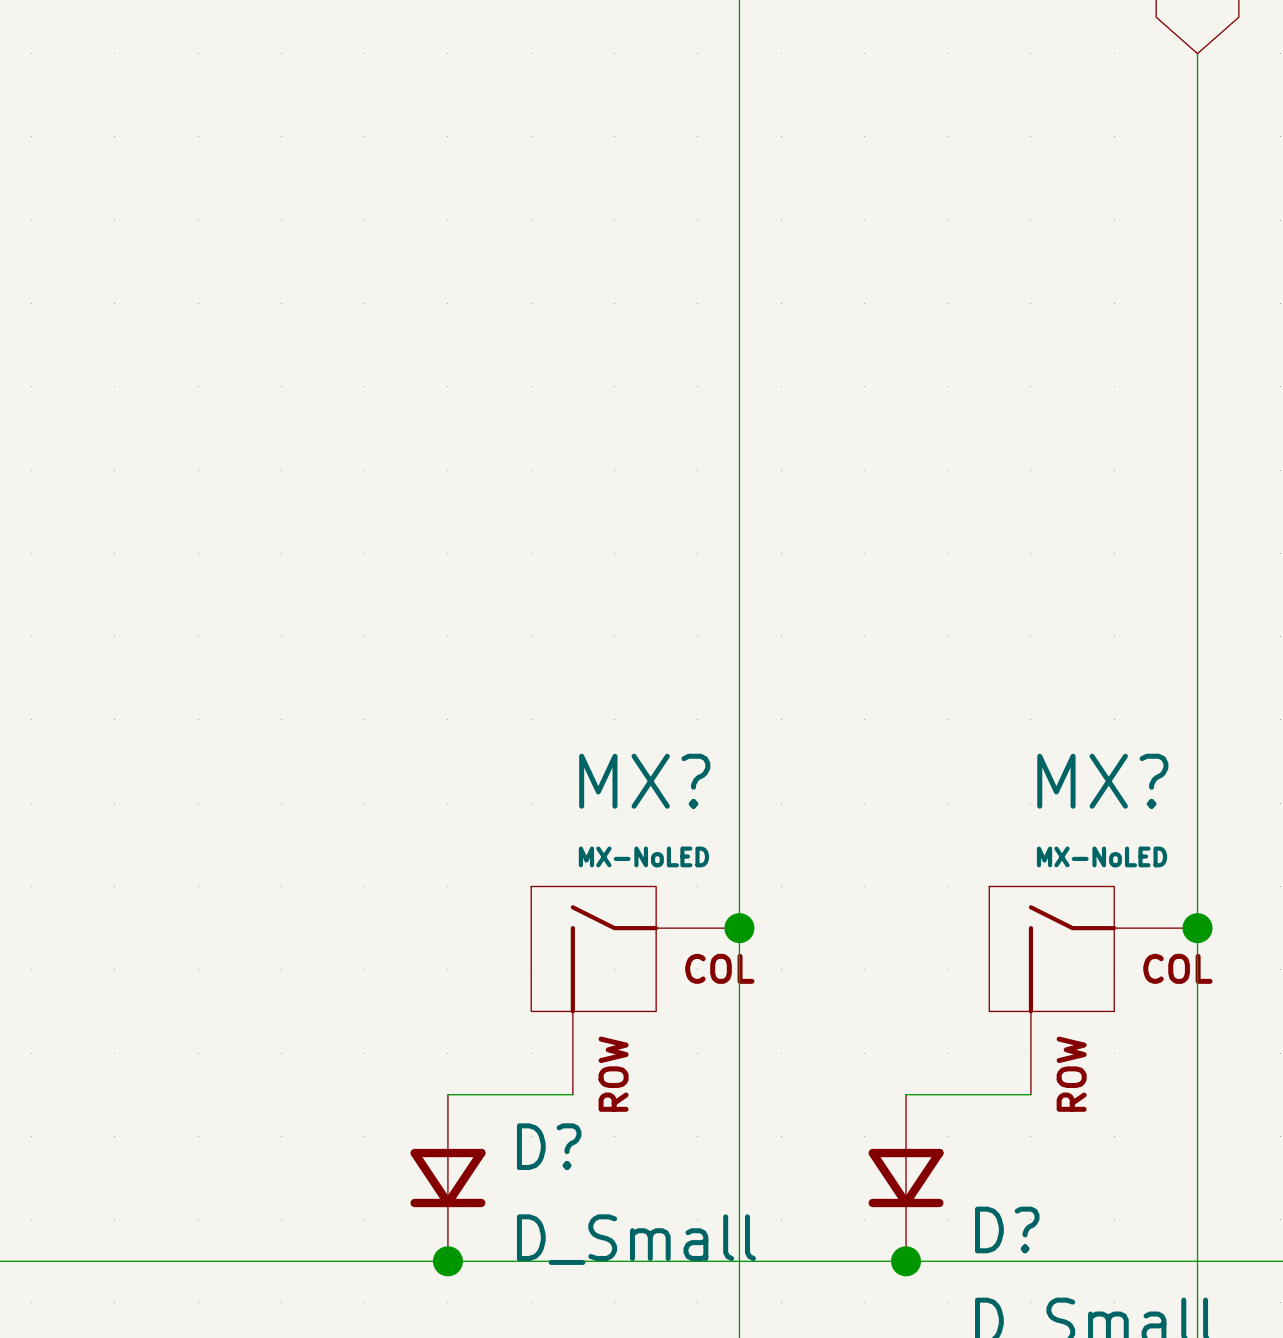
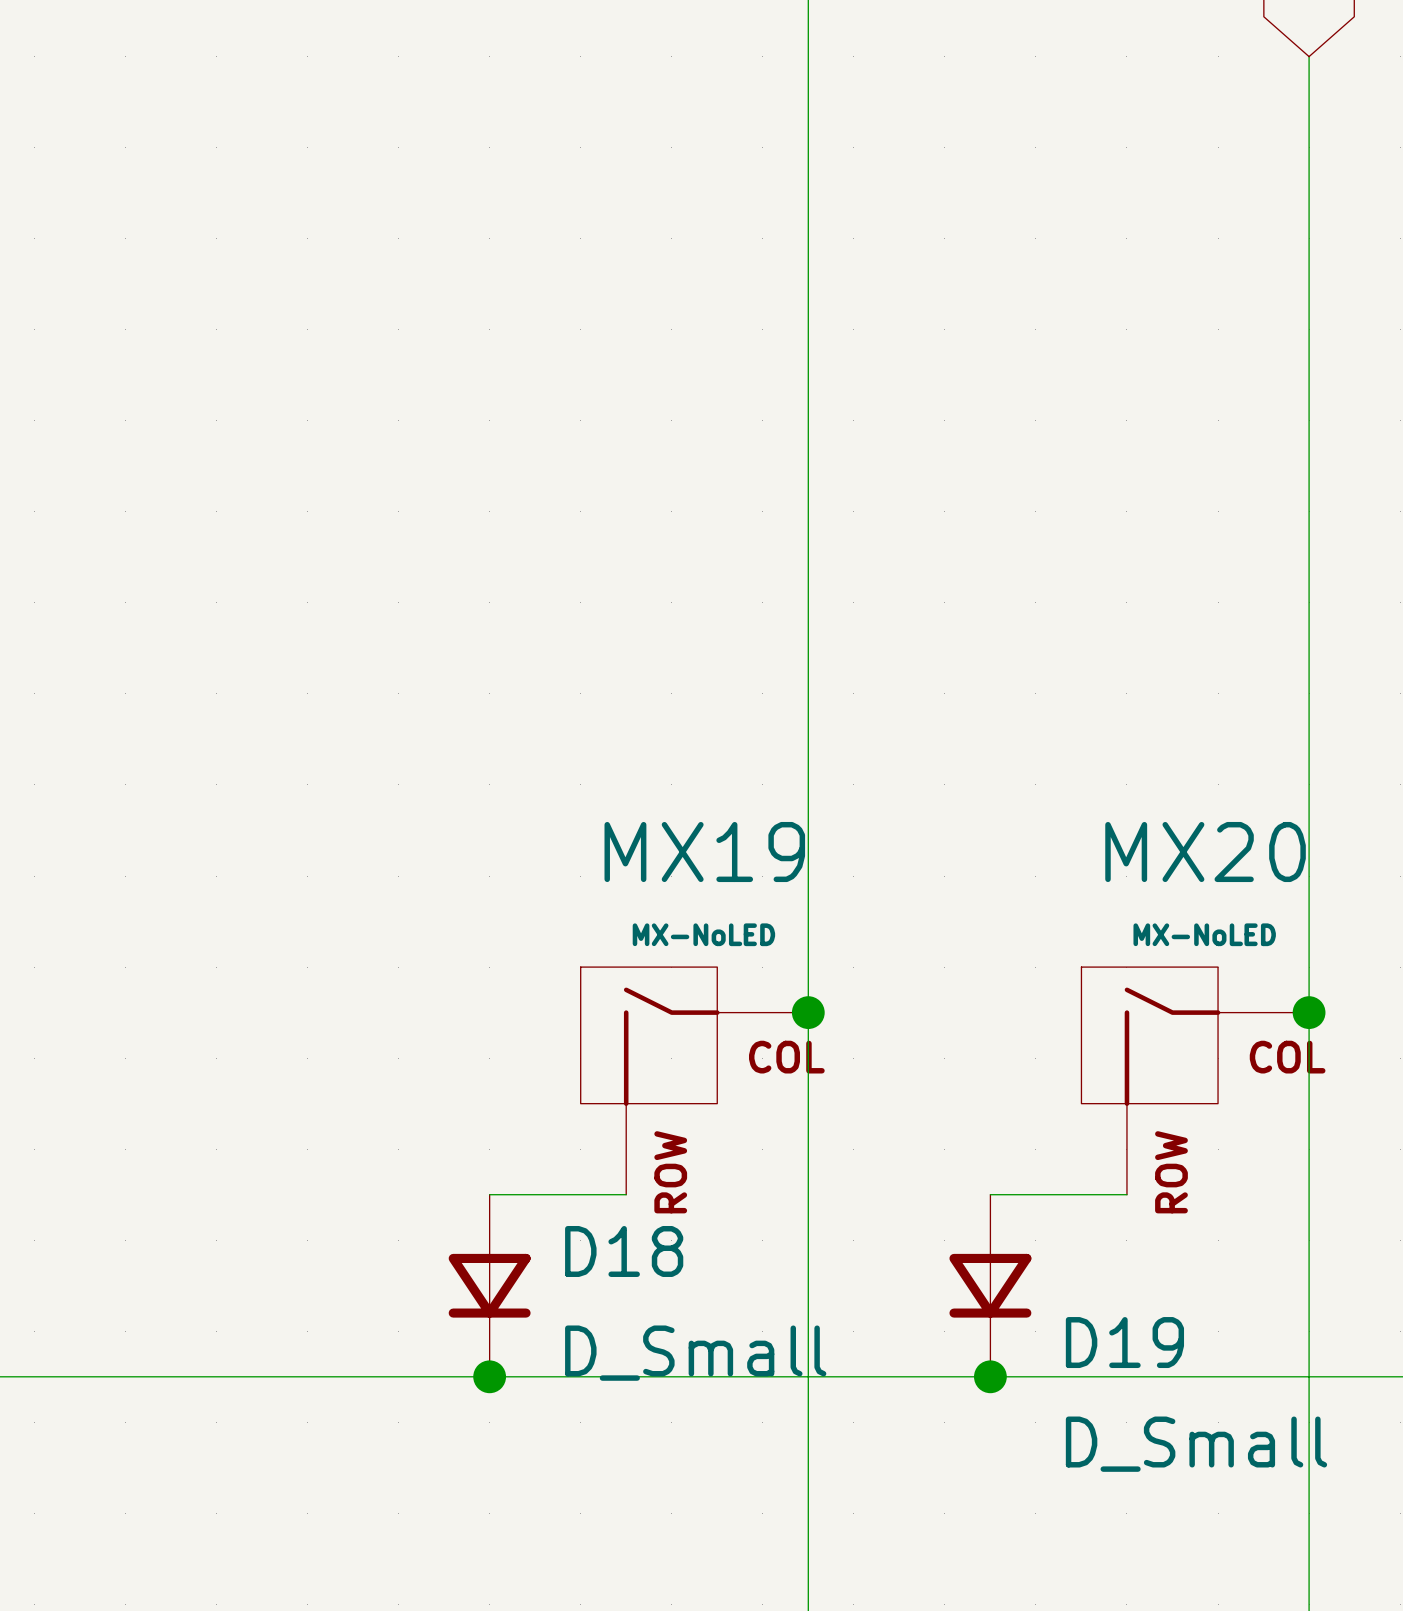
MX? name: MX? (644, 781) -> MX19 (704, 852)
MX? name: MX? (1102, 781) -> MX20 (1205, 852)
D? name: D? (549, 1146) -> D18 (624, 1251)
D? name: D? (1007, 1229) -> D19 (1124, 1342)

